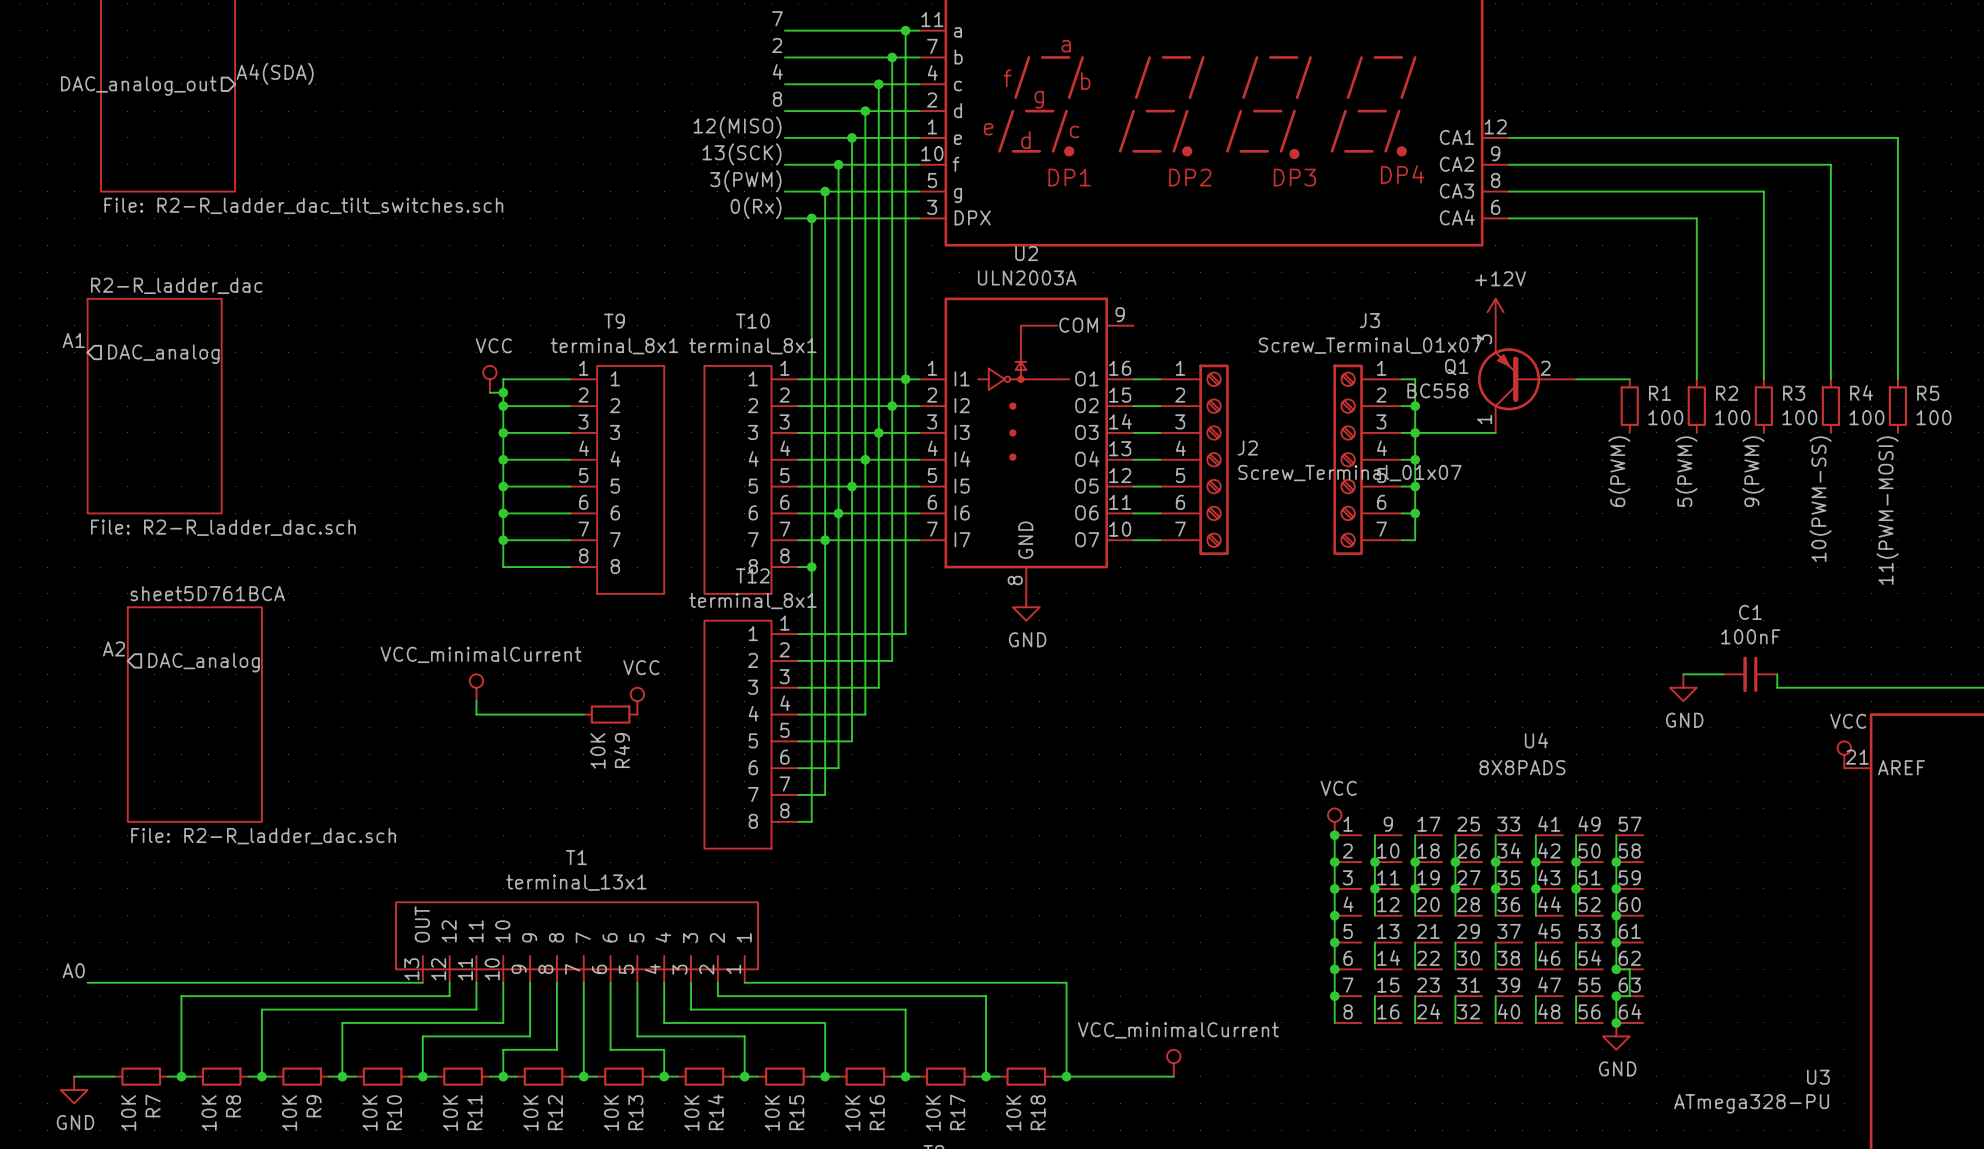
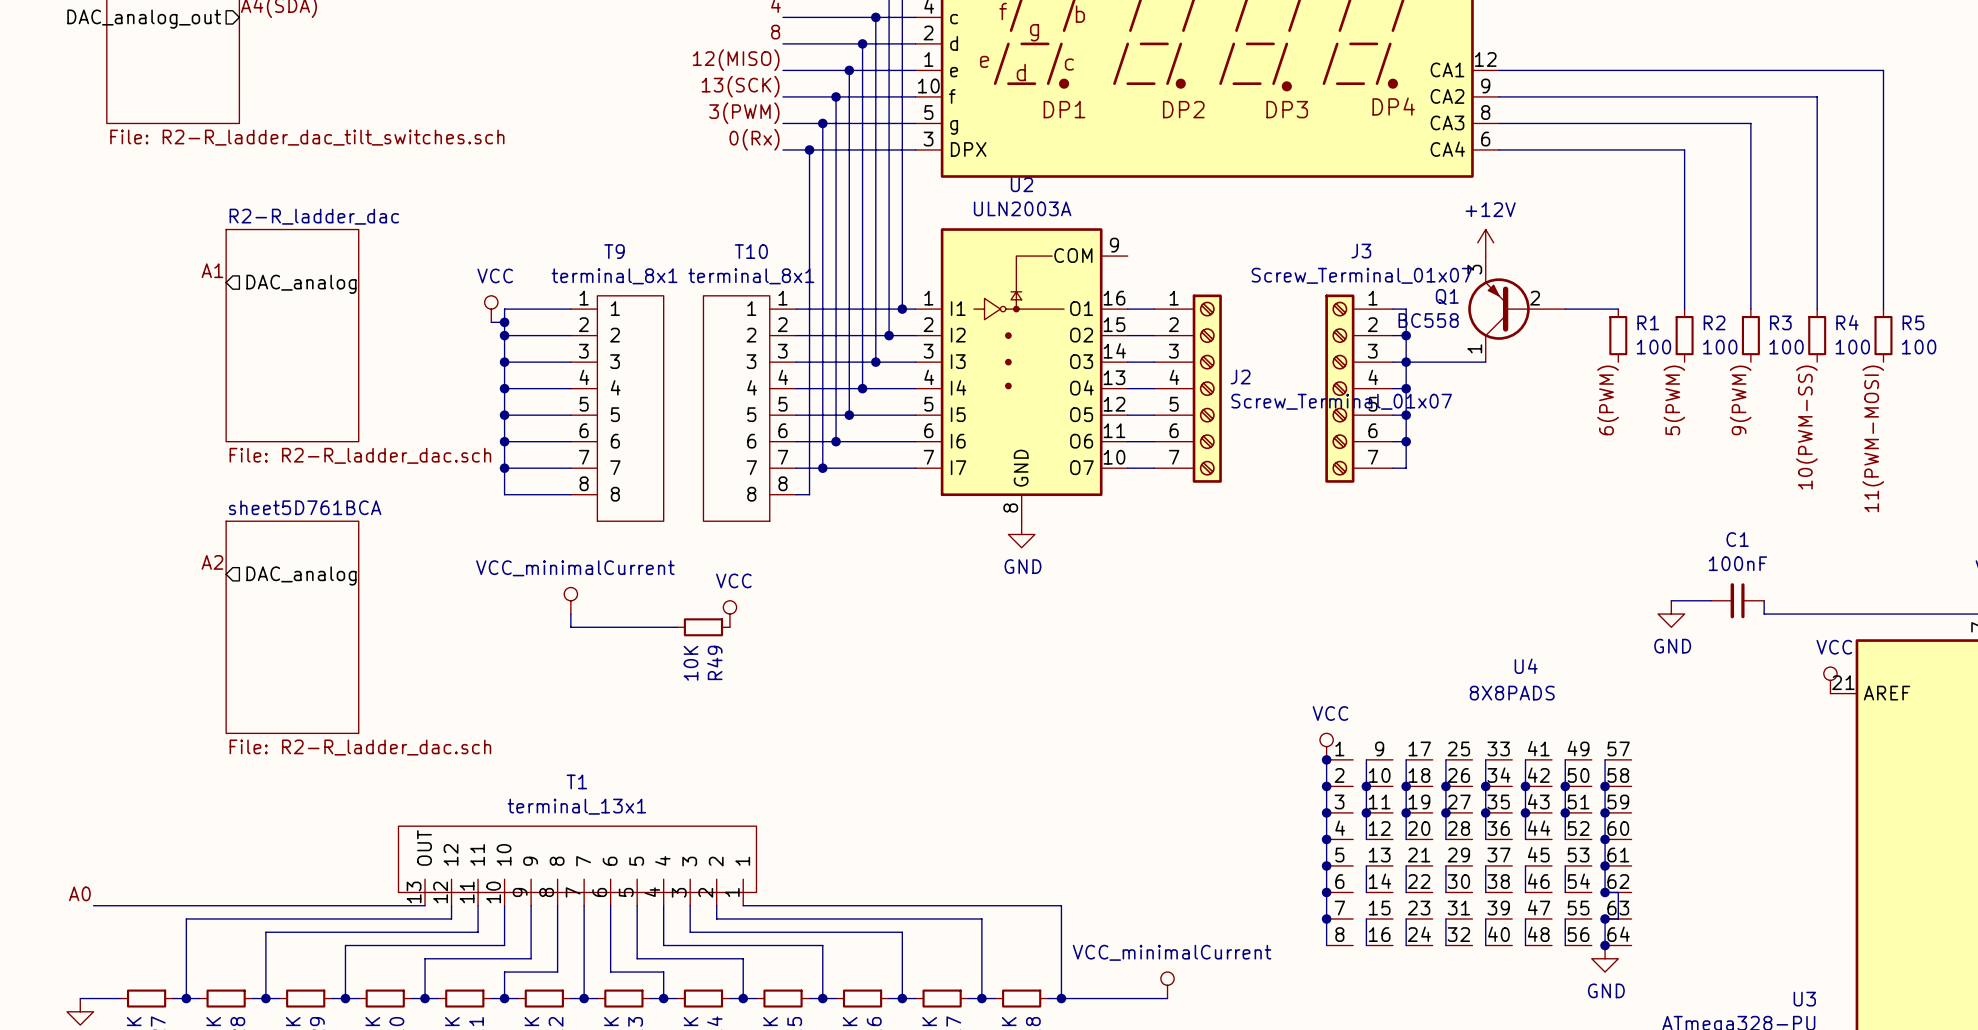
label position: A1 (73, 340) -> A1 (212, 270)
sheet pin position: DAC_analog (163, 354) -> DAC_analog (301, 284)
wire: (905, 379) (905, 634) (798, 634) -> none
sheet R2-R_ladder_dac position: (154, 406) -> (292, 335)
wire: (892, 406) (892, 660) (798, 660) -> none
wire: (878, 432) (878, 687) (798, 687) -> none
wire: (865, 459) (865, 714) (798, 714) -> none
wire: (851, 486) (851, 741) (798, 741) -> none
wire: (838, 513) (838, 768) (798, 768) -> none
wire: (825, 540) (825, 795) (798, 795) -> none
wire: (811, 567) (811, 821) (798, 821) -> none
junction: (811, 567) -> none
label position: A2 (113, 648) -> A2 (212, 562)
sheet pin position: DAC_analog (204, 662) -> DAC_analog (301, 575)
power symbol position: VCC_minimalCurrent (476, 687) -> VCC_minimalCurrent (570, 600)
wire: (476, 701) (476, 714) (583, 714) -> (570, 614) (570, 627) (676, 627)
power symbol position: VCC (637, 701) -> VCC (729, 614)
sheet sheet5D761BCA position: (194, 714) -> (292, 627)
R49 position: (610, 714) -> (703, 627)
T12: terminal_8x1 (751, 734) -> none

